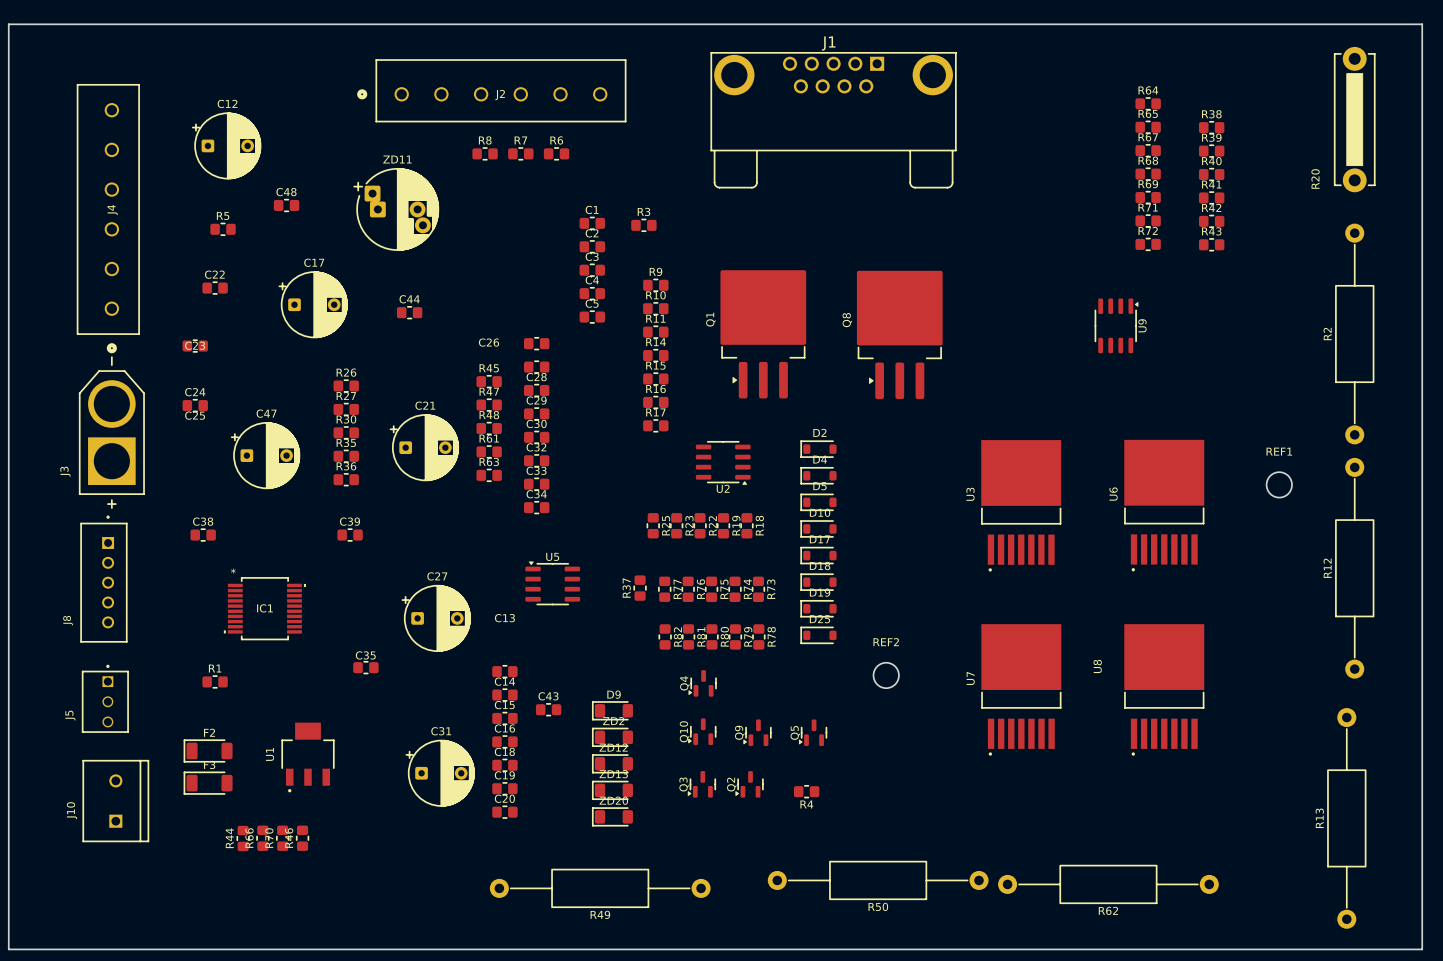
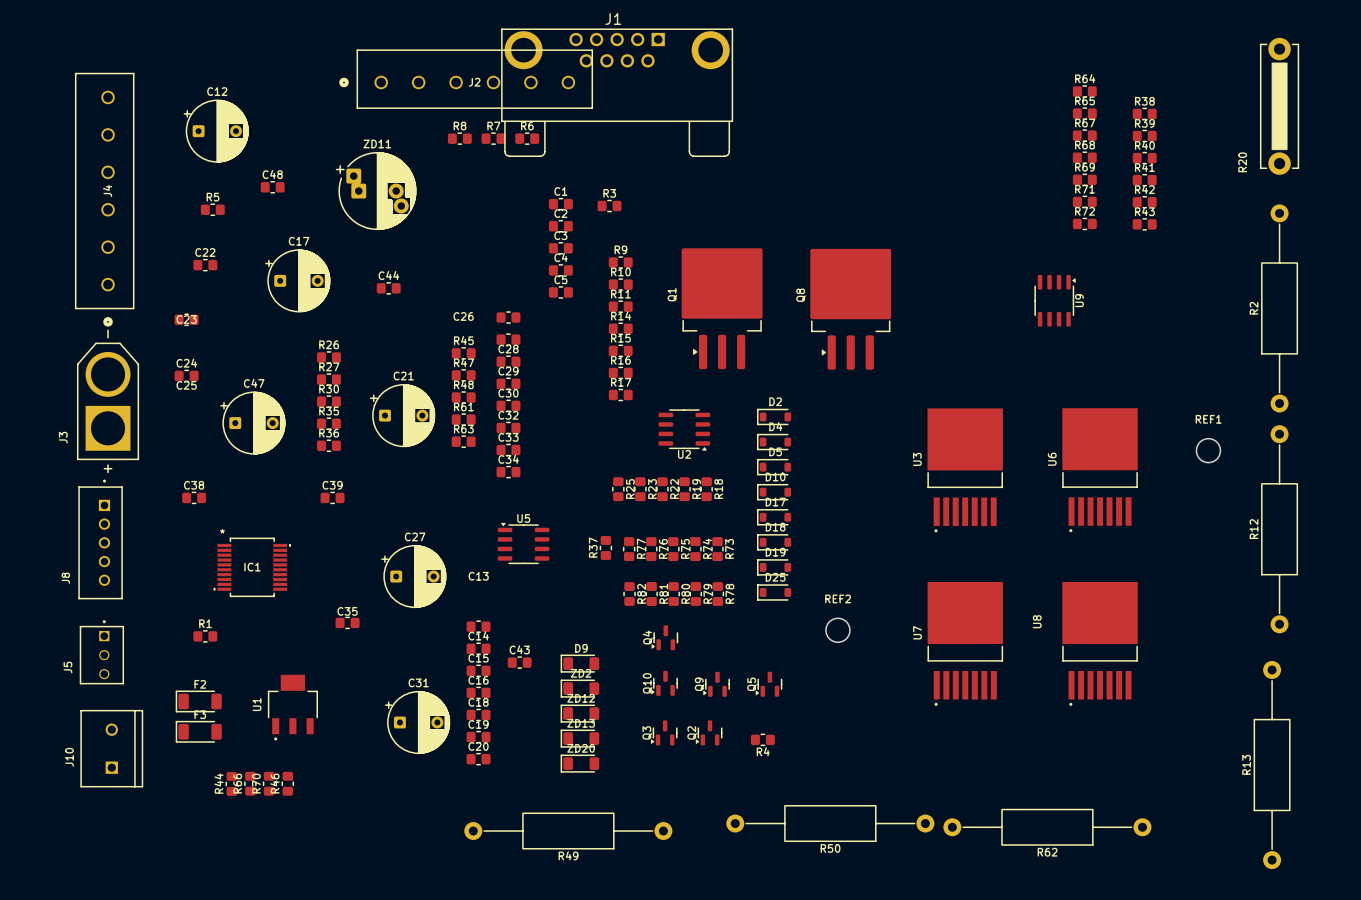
board edge: (8, 24) (1422, 24) (1422, 949) (8, 949) (8, 24) -> none
J1 position: (833, 120) -> (617, 92)

